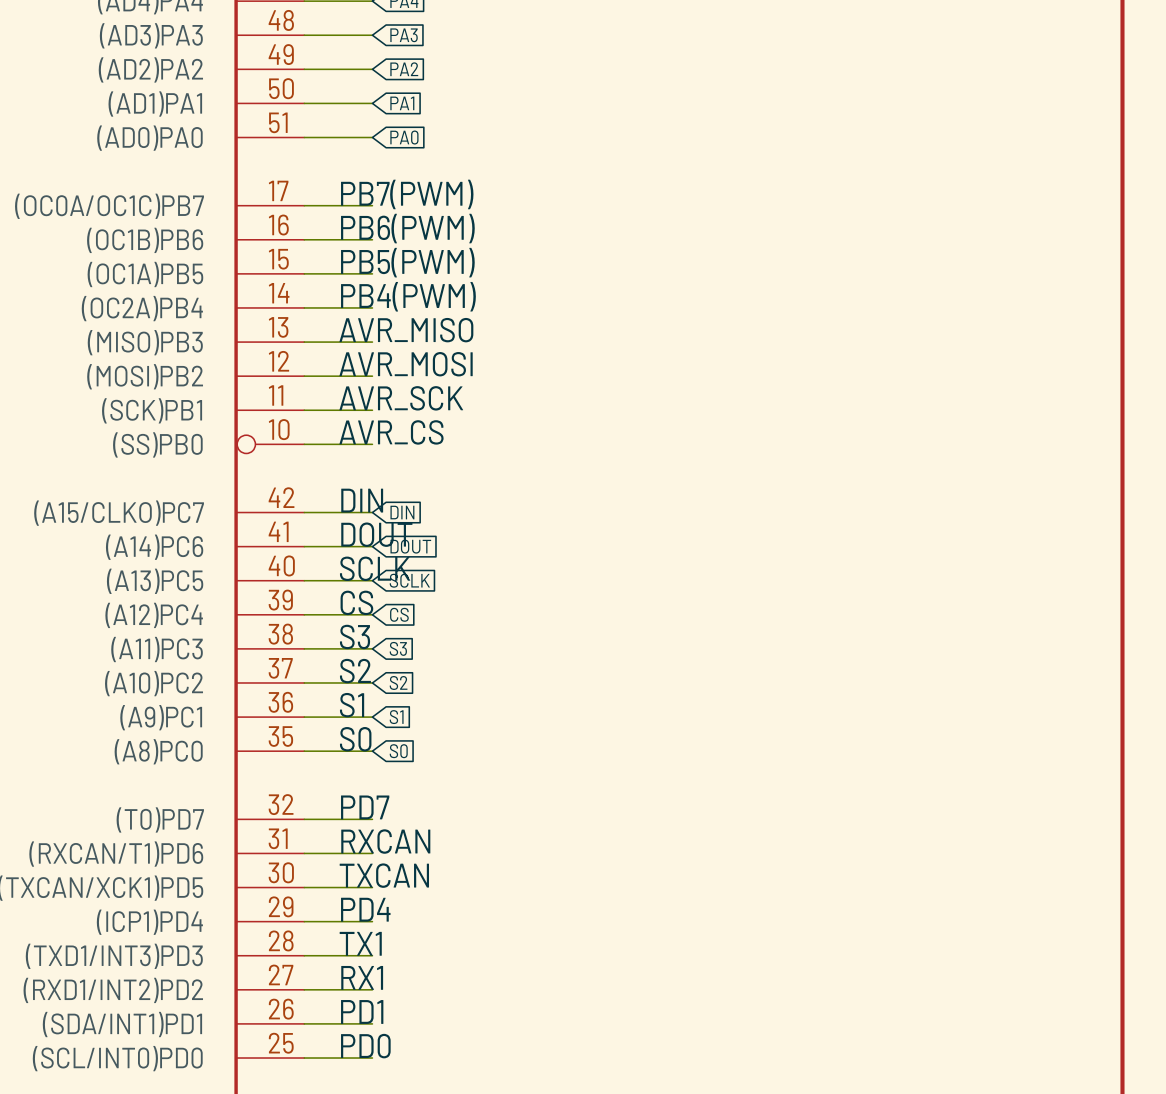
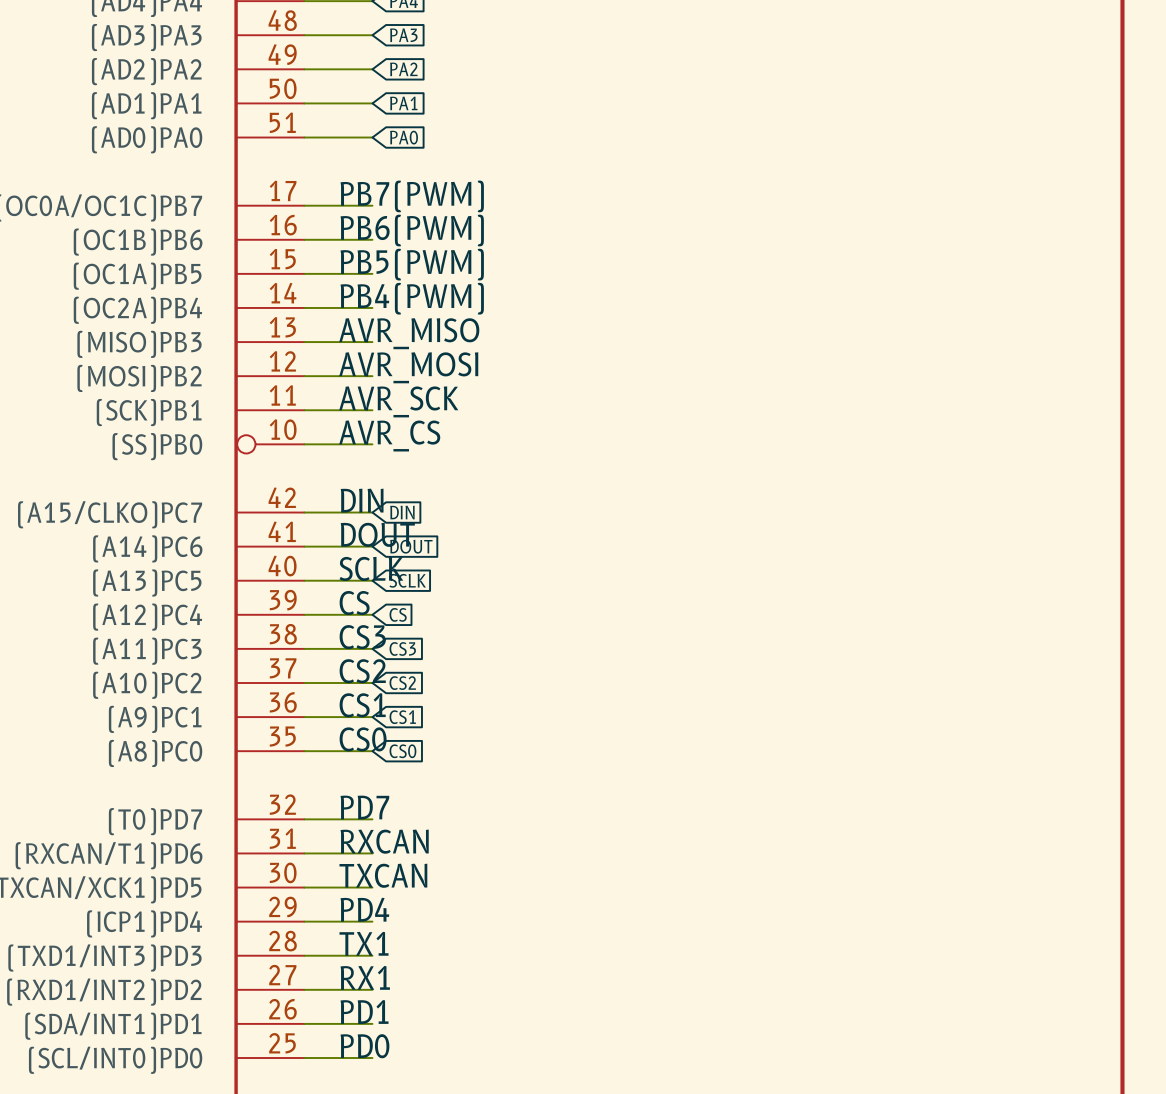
label: S3 (355, 636) -> CS3 (362, 637)
global label: S3 (398, 648) -> CS3 (402, 648)
label: S2 (355, 671) -> CS2 (362, 671)
global label: S2 (398, 682) -> CS2 (402, 683)
label: S1 (352, 705) -> CS1 (362, 705)
global label: S1 (396, 717) -> CS1 (402, 717)
label: S0 (355, 739) -> CS0 (363, 739)
global label: S0 (398, 751) -> CS0 (402, 751)

